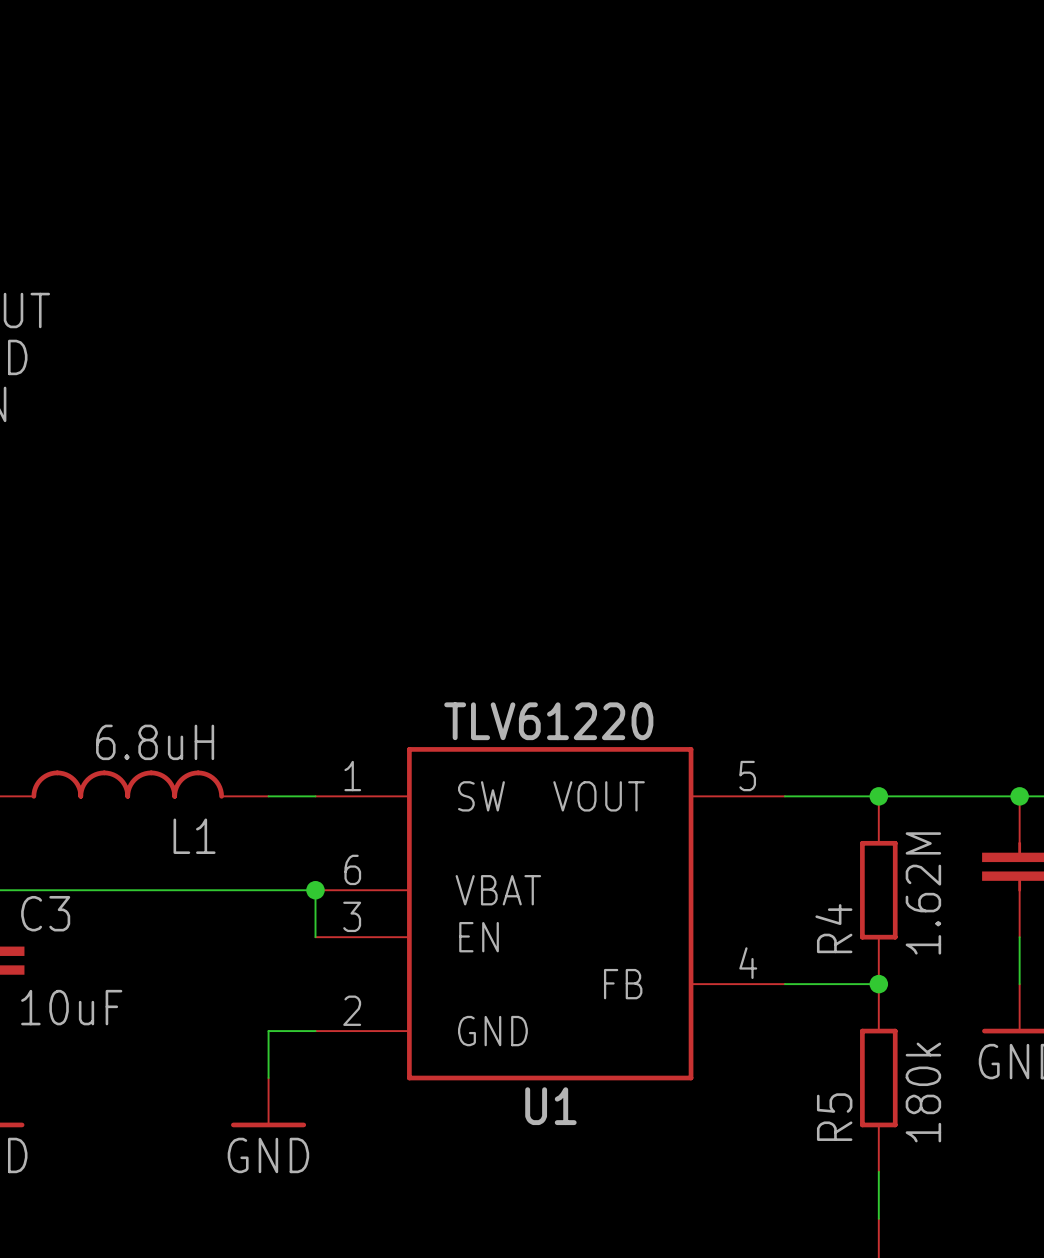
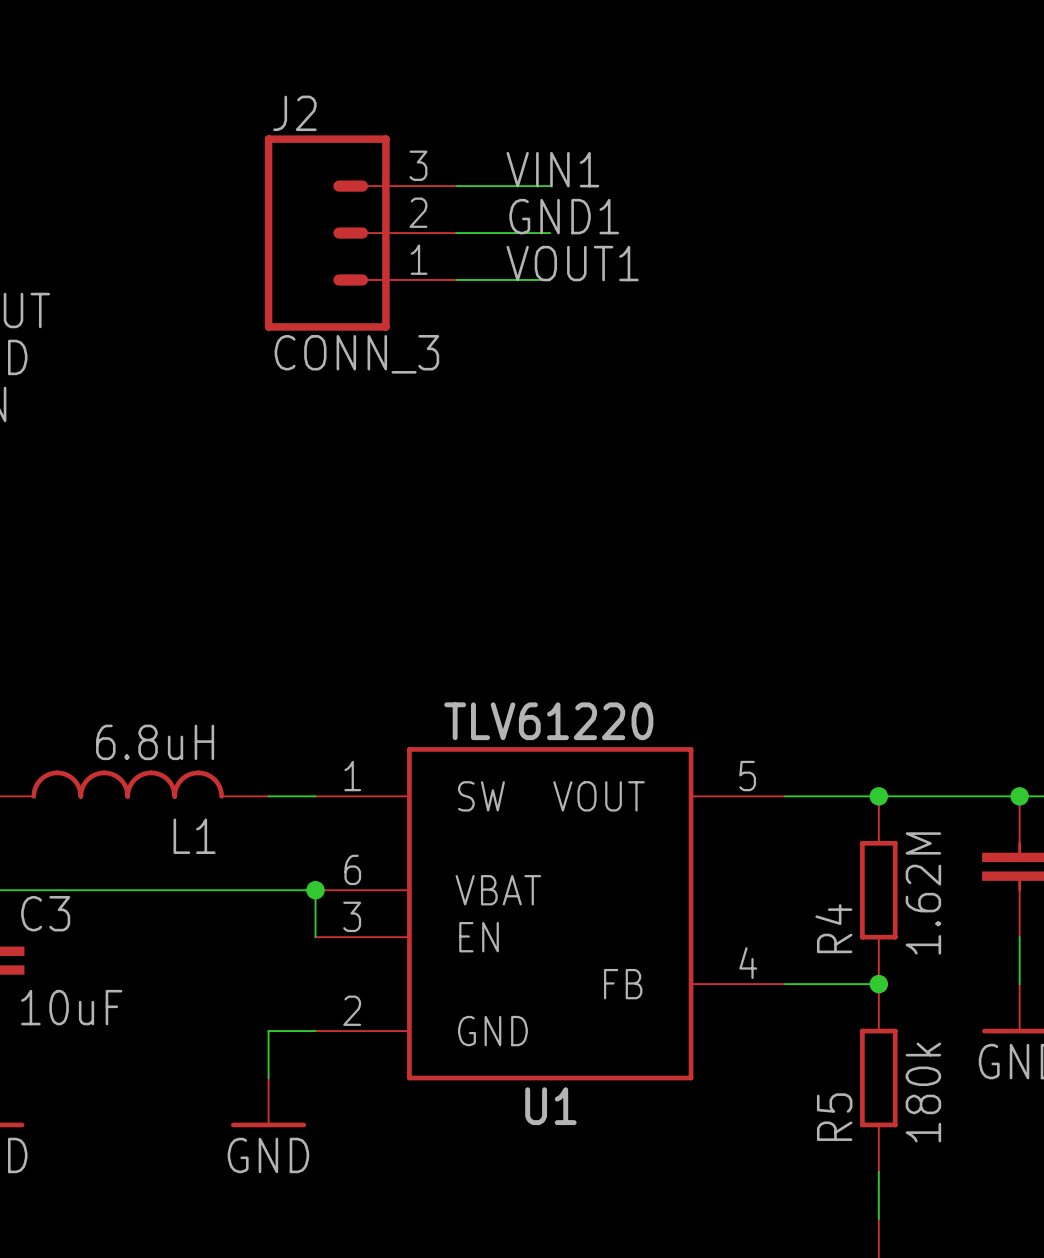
label: none -> VIN1 (552, 169)
wire: none -> (456, 186) (550, 186)
label: none -> GND1 (564, 216)
J2: none -> CONN_3 (360, 233)
wire: none -> (456, 233) (550, 233)
label: none -> VOUT1 (572, 263)
wire: none -> (456, 279) (550, 279)

